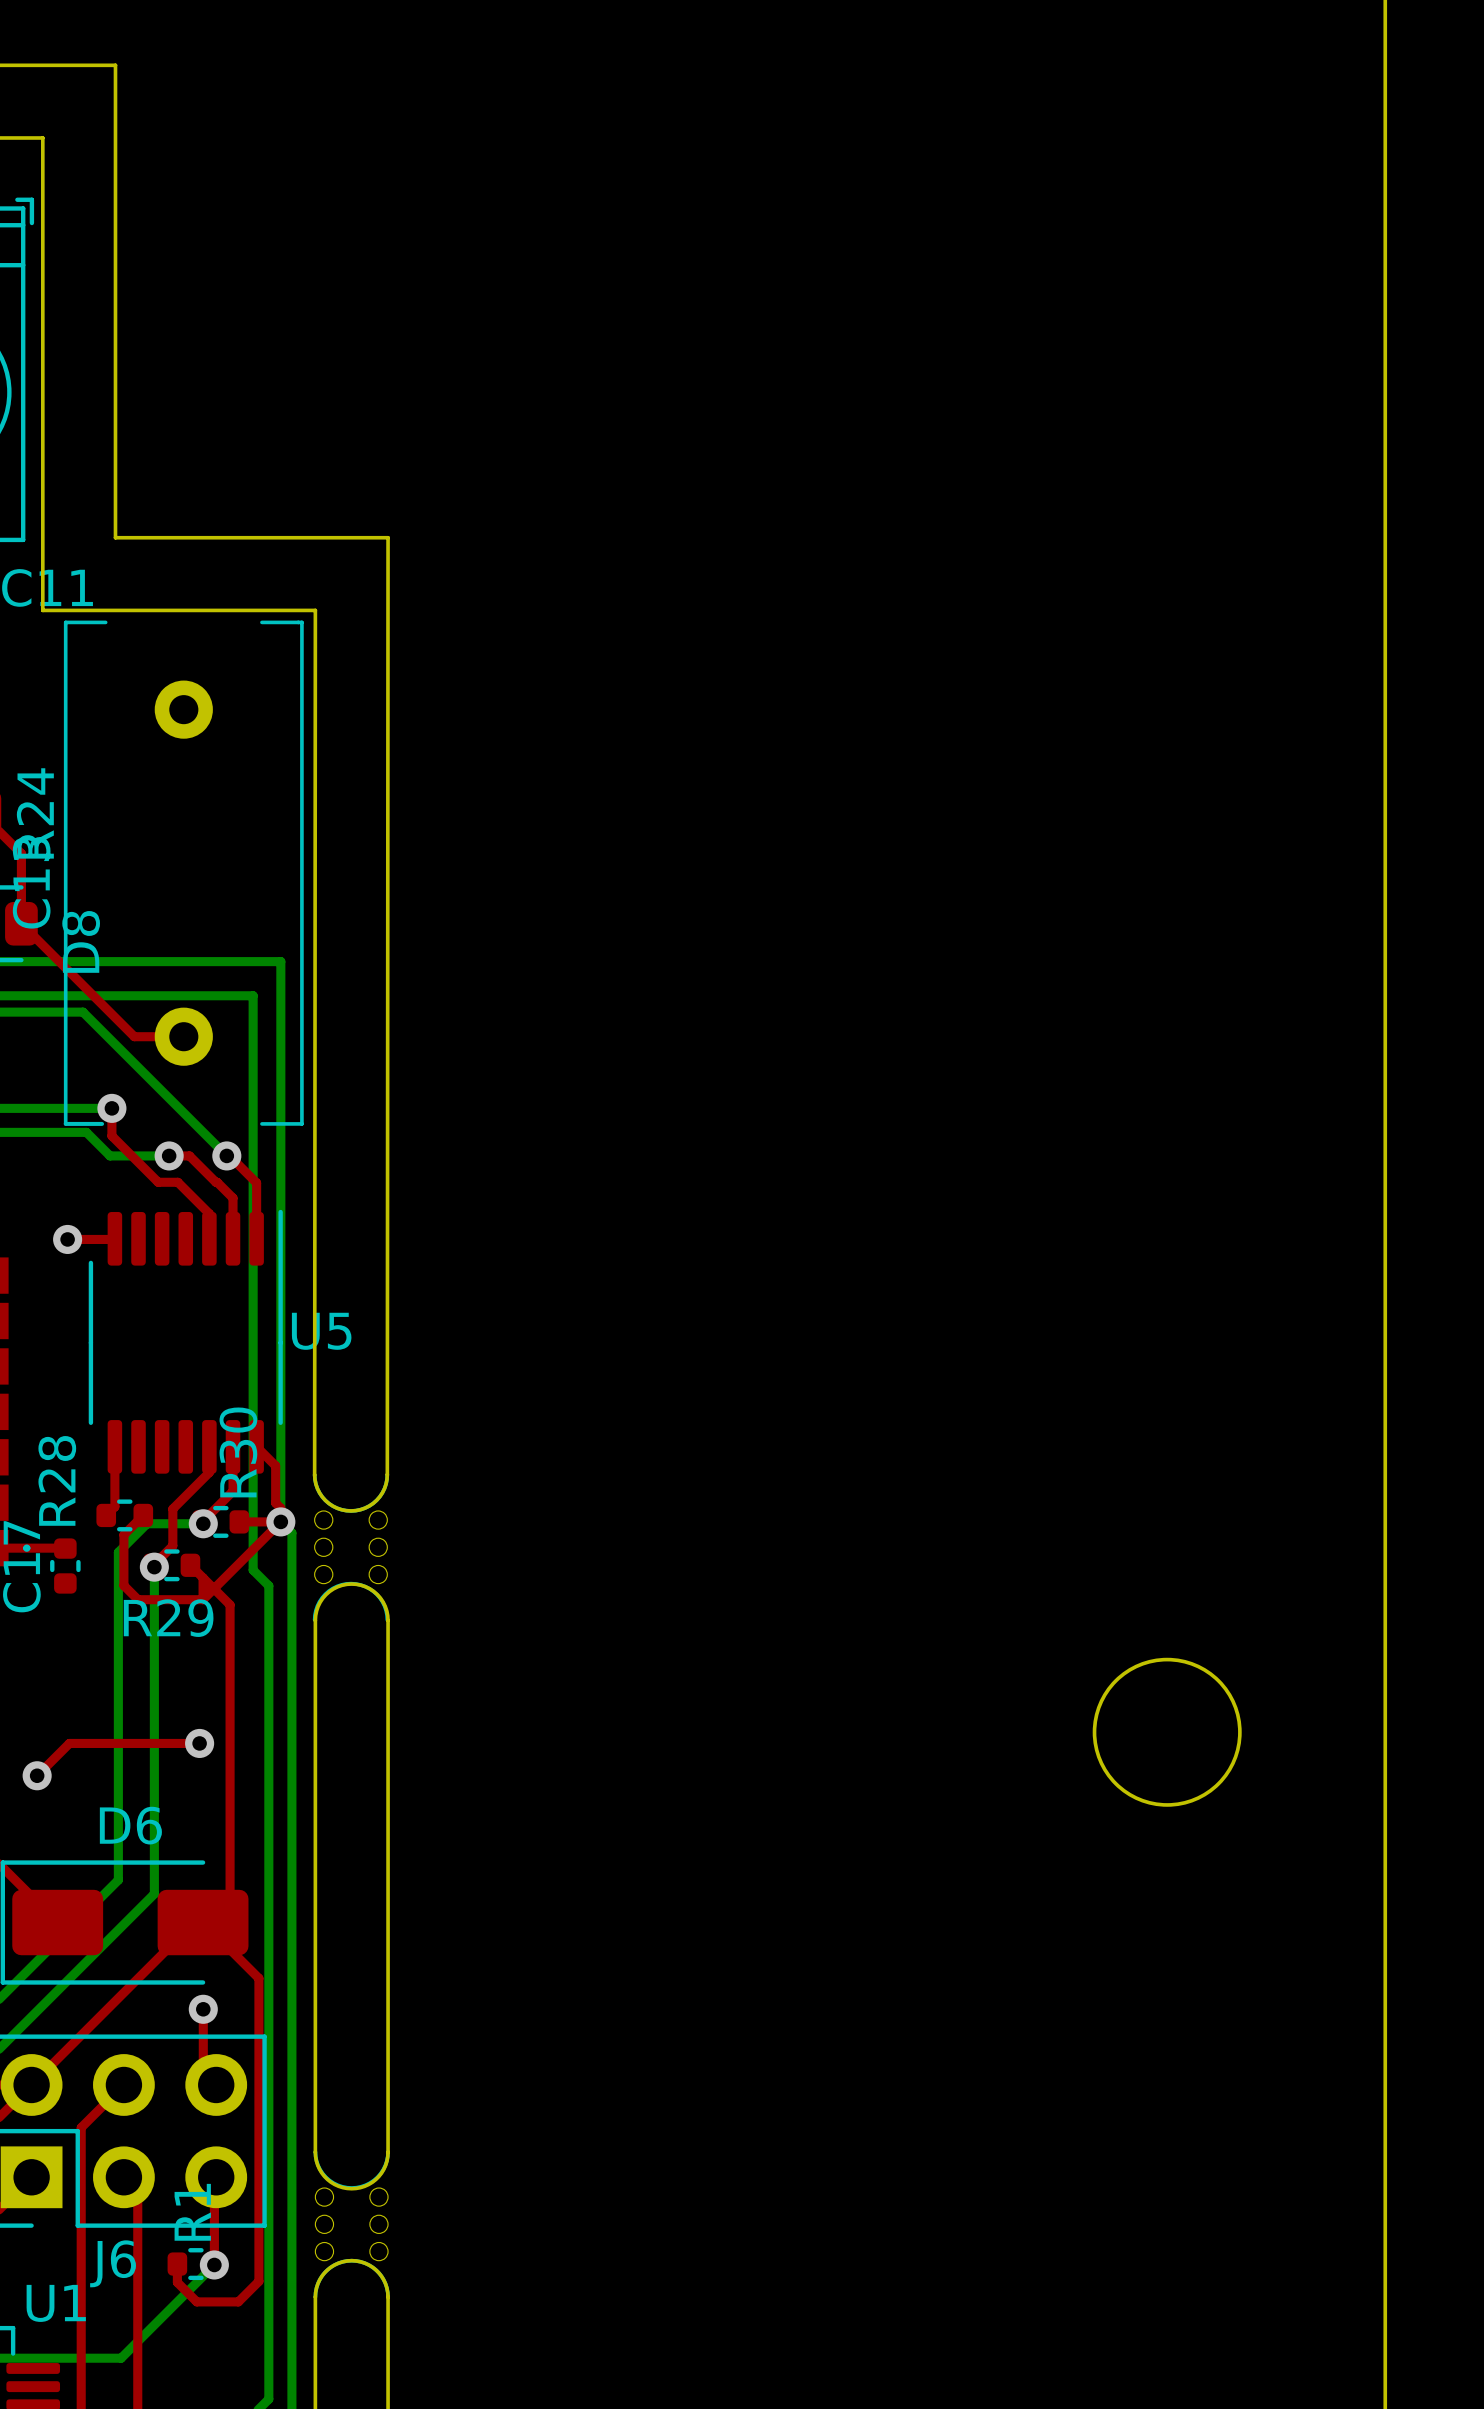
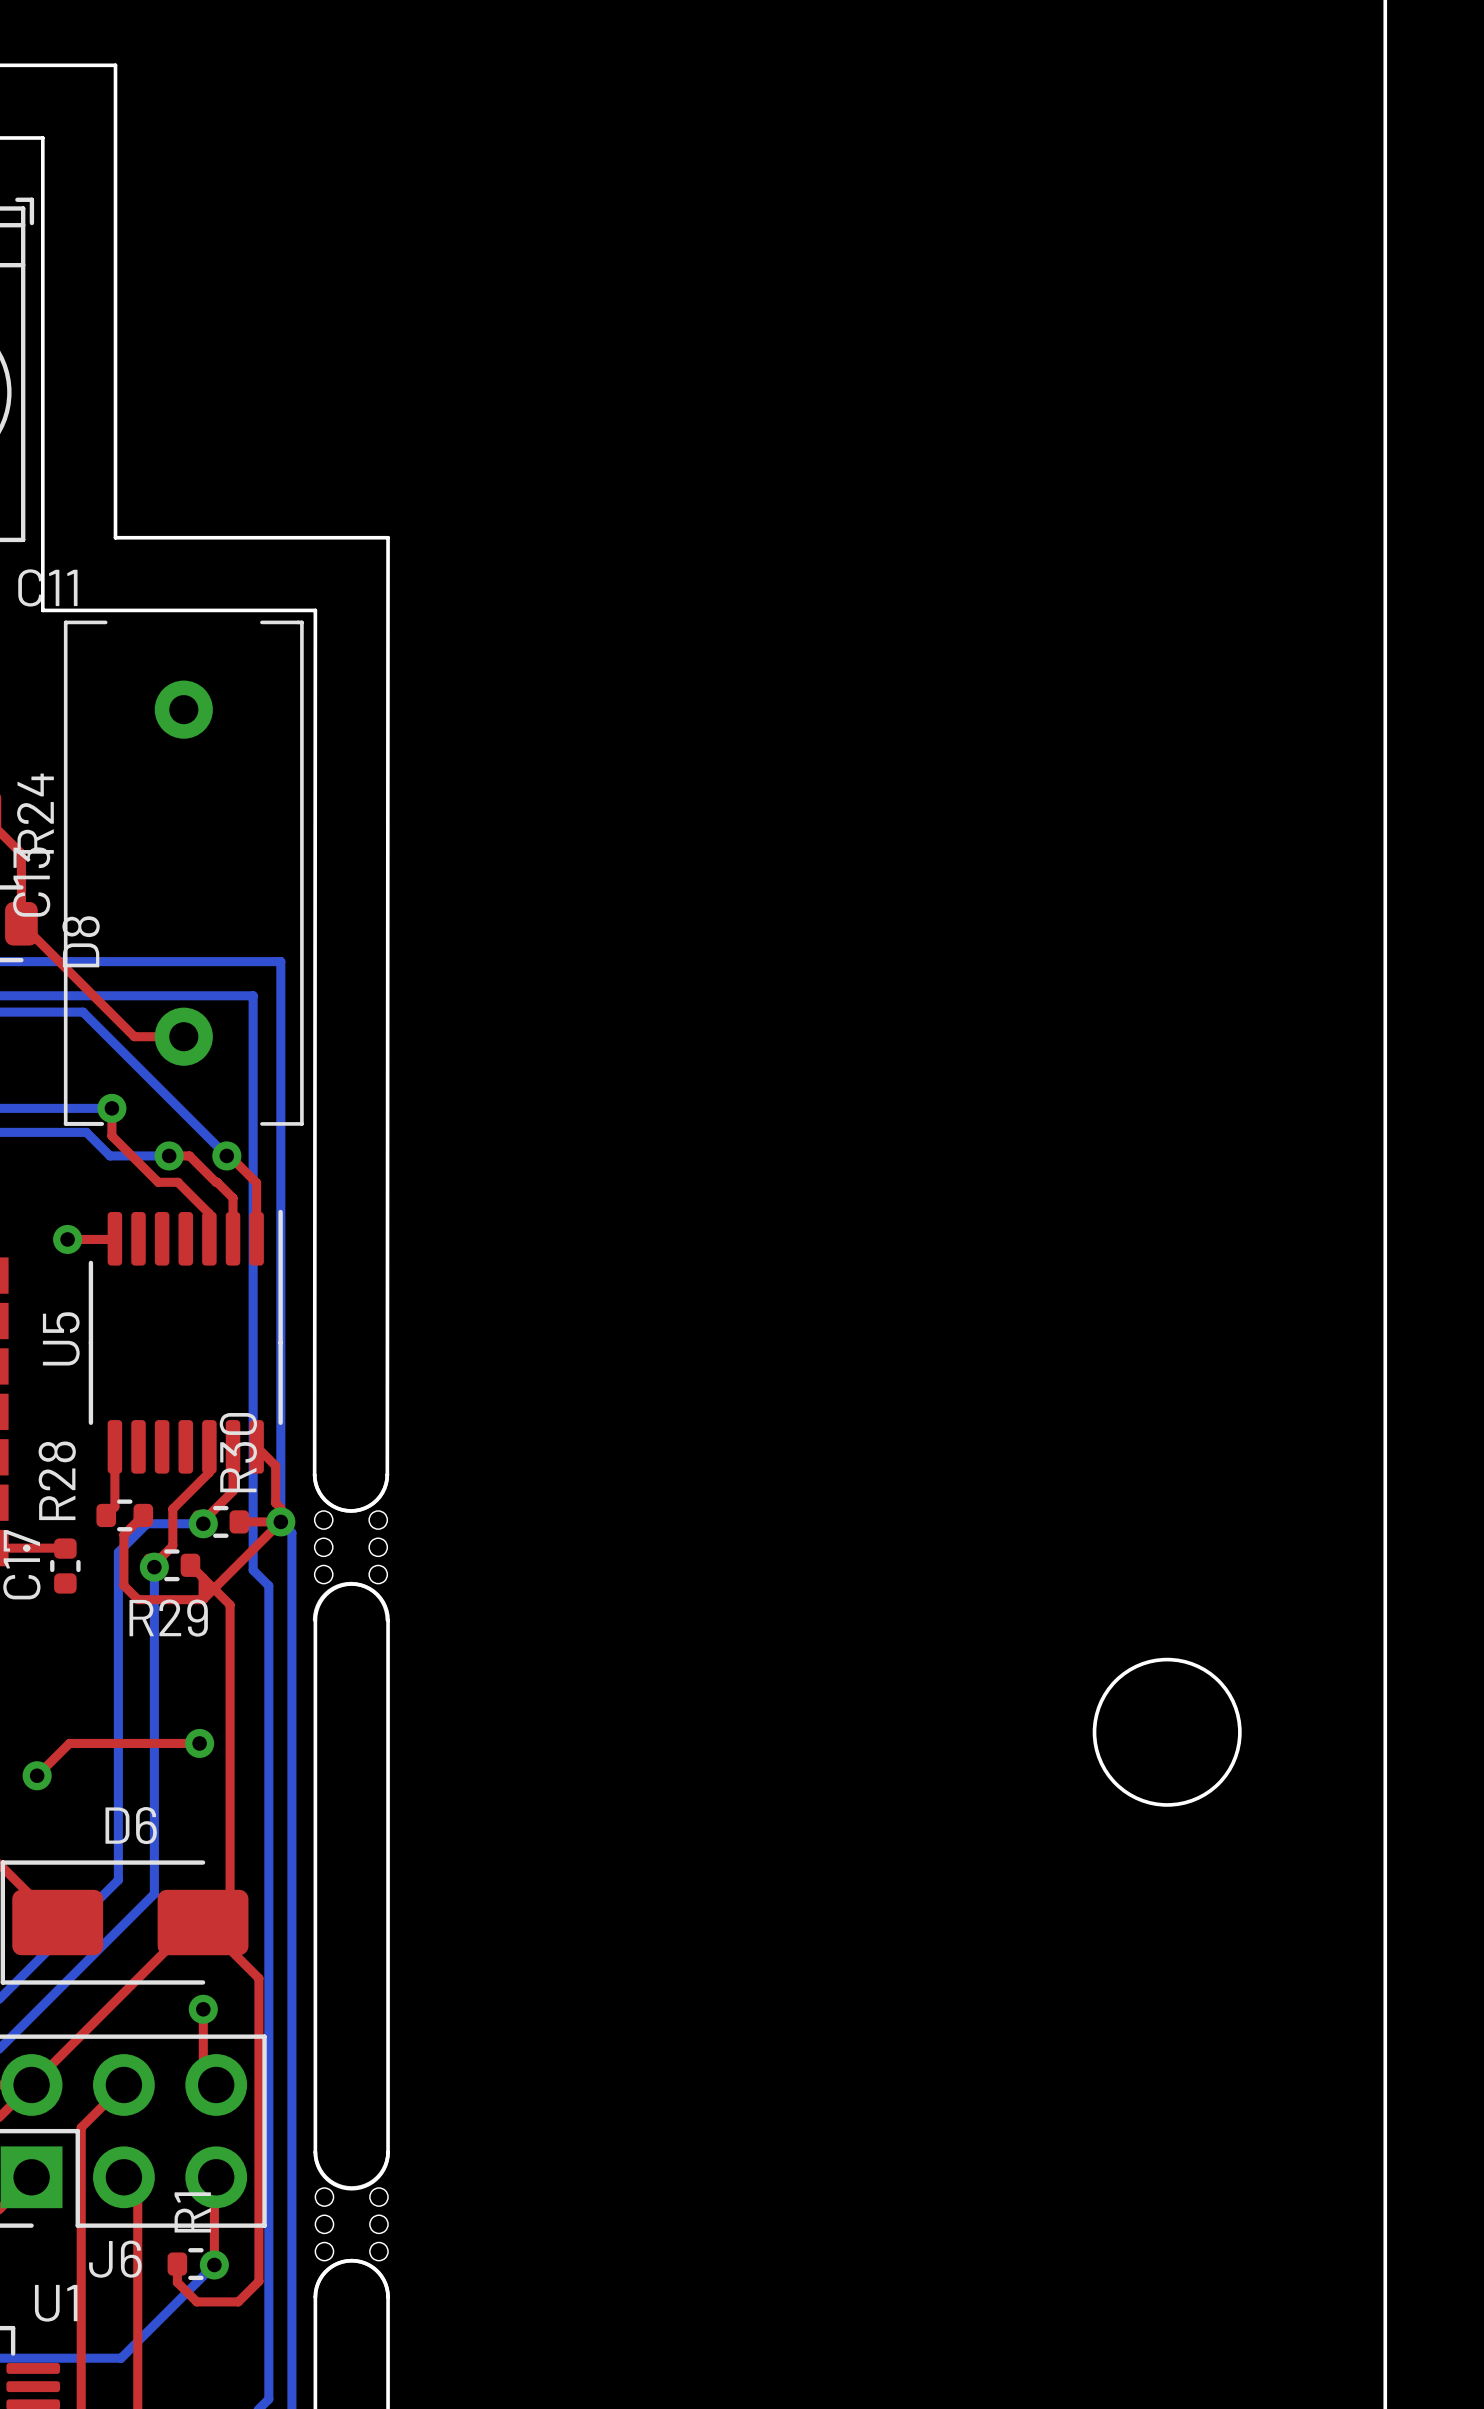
U5 name rotation: 0° (321, 1331) -> 90° counterclockwise (61, 1338)
U5 name position: U5 (321, 1331) -> U5 (61, 1338)

